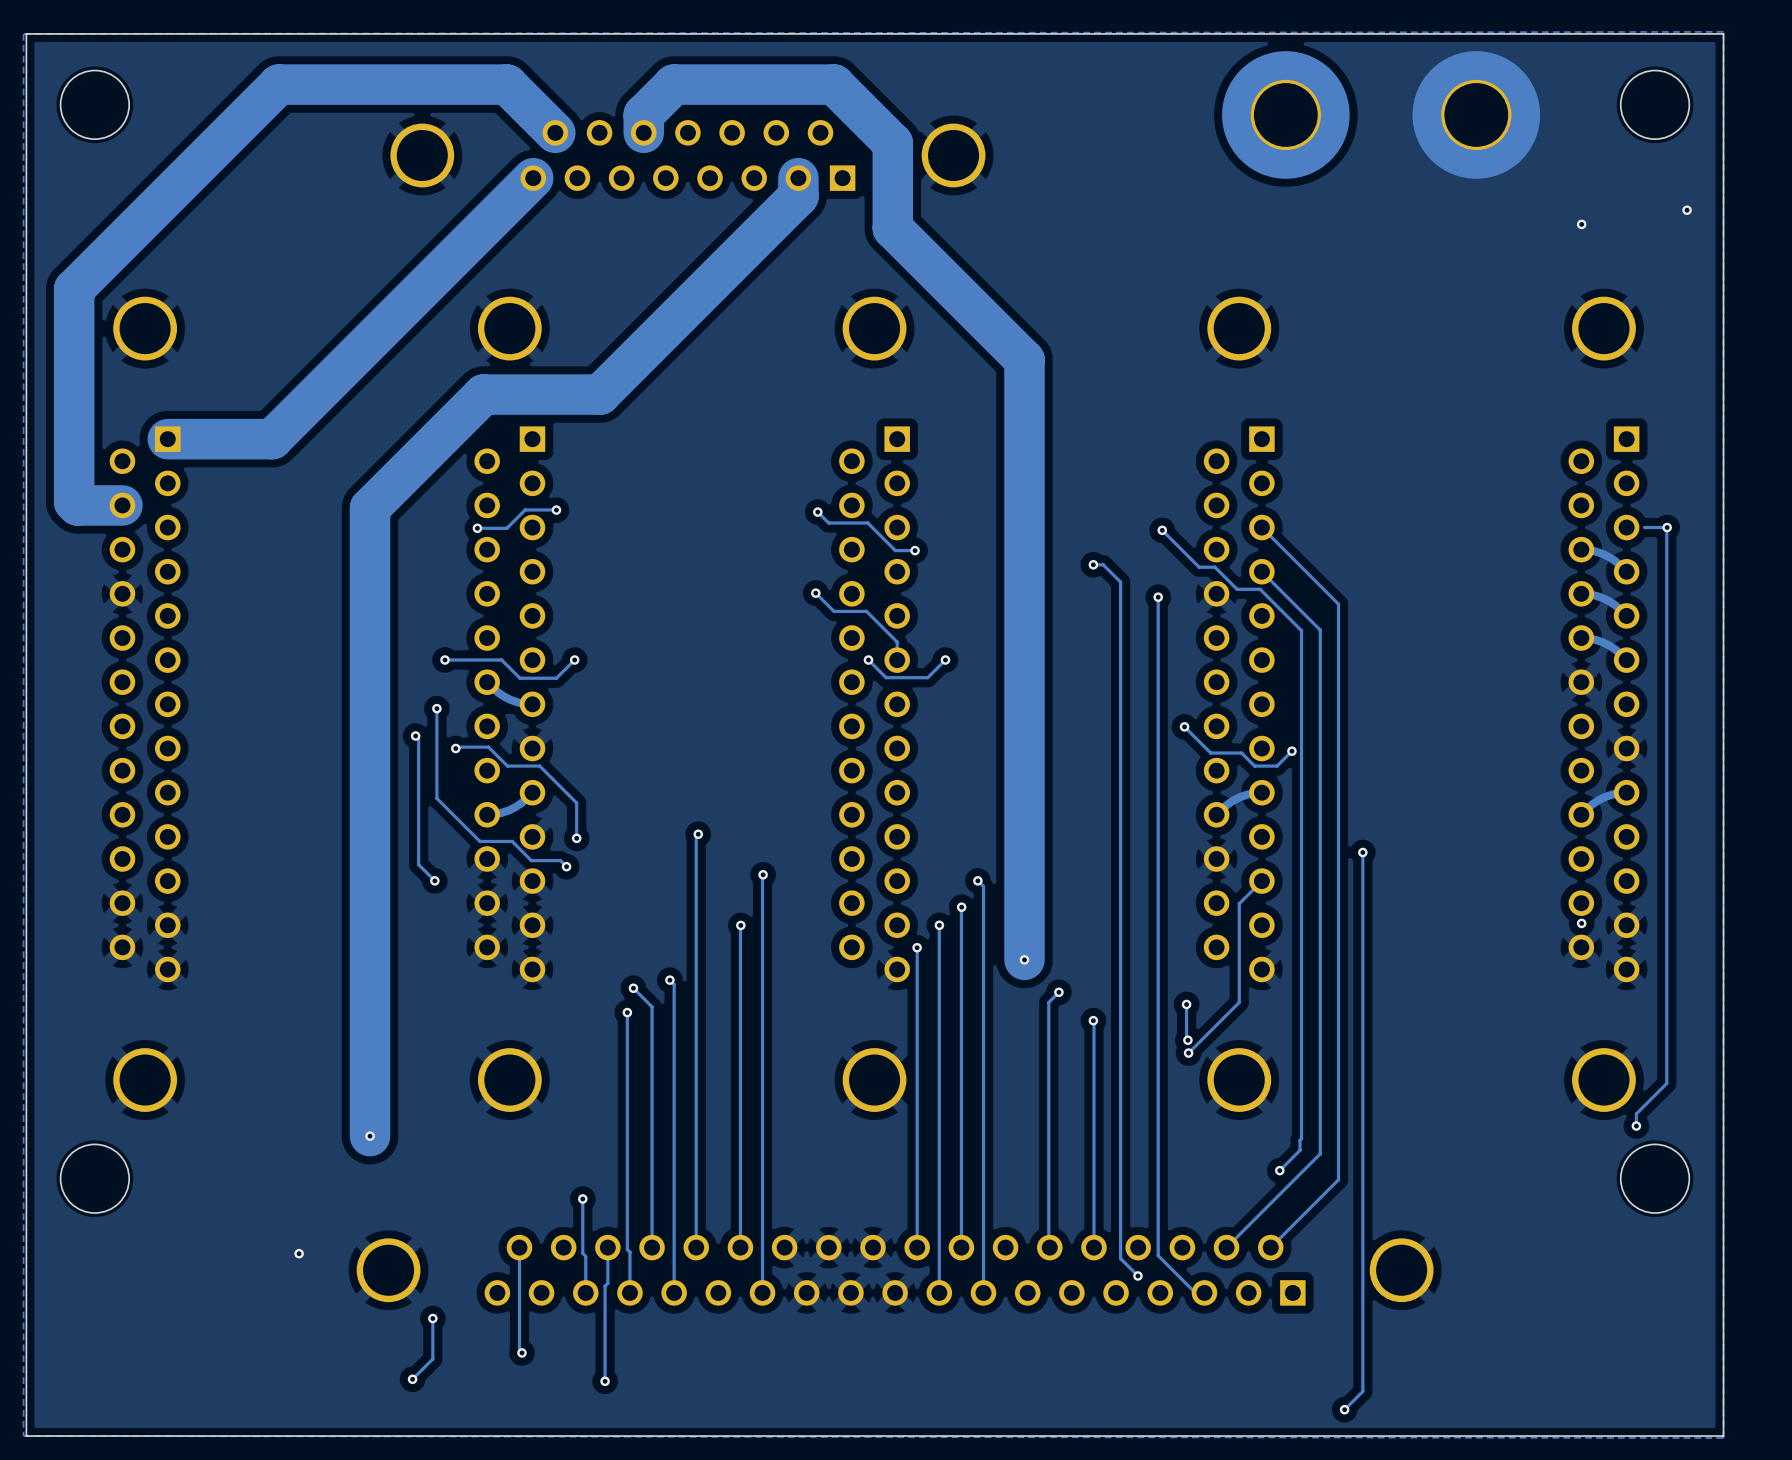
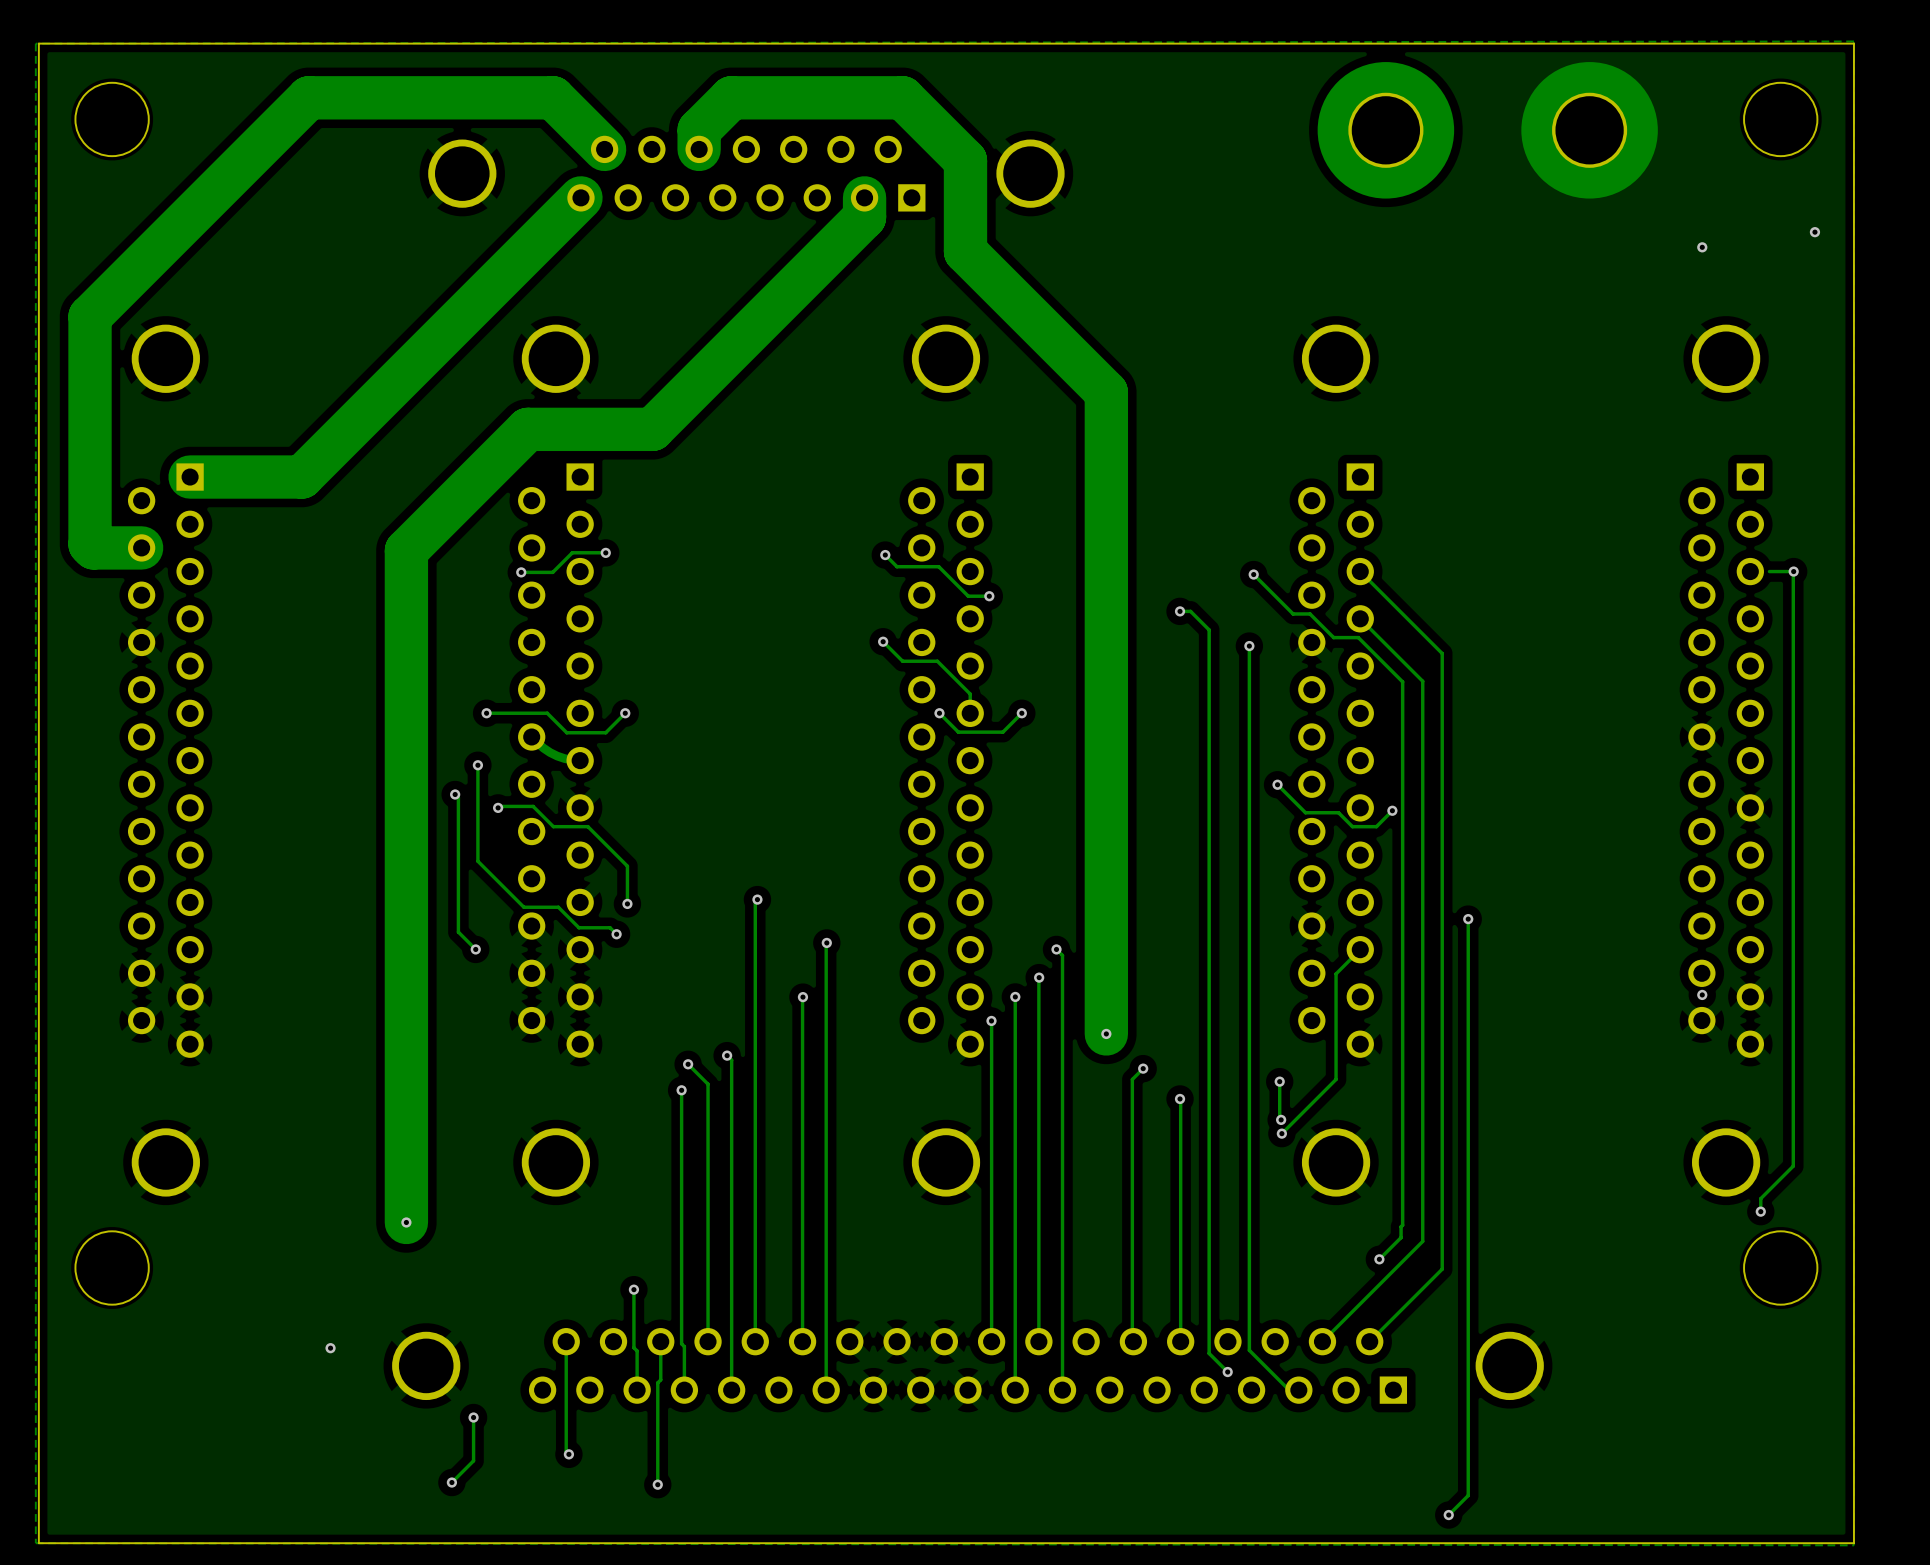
track: (1581, 549) (1602, 553) (1620, 566) -> none
track: (1581, 593) (1602, 598) (1620, 610) -> none
track: (1581, 638) (1602, 642) (1620, 654) -> none
track: (1261, 792) (1240, 796) (1222, 809) -> none
track: (1626, 792) (1605, 796) (1586, 809) -> none
track: (526, 798) (508, 810) (487, 814) -> none

